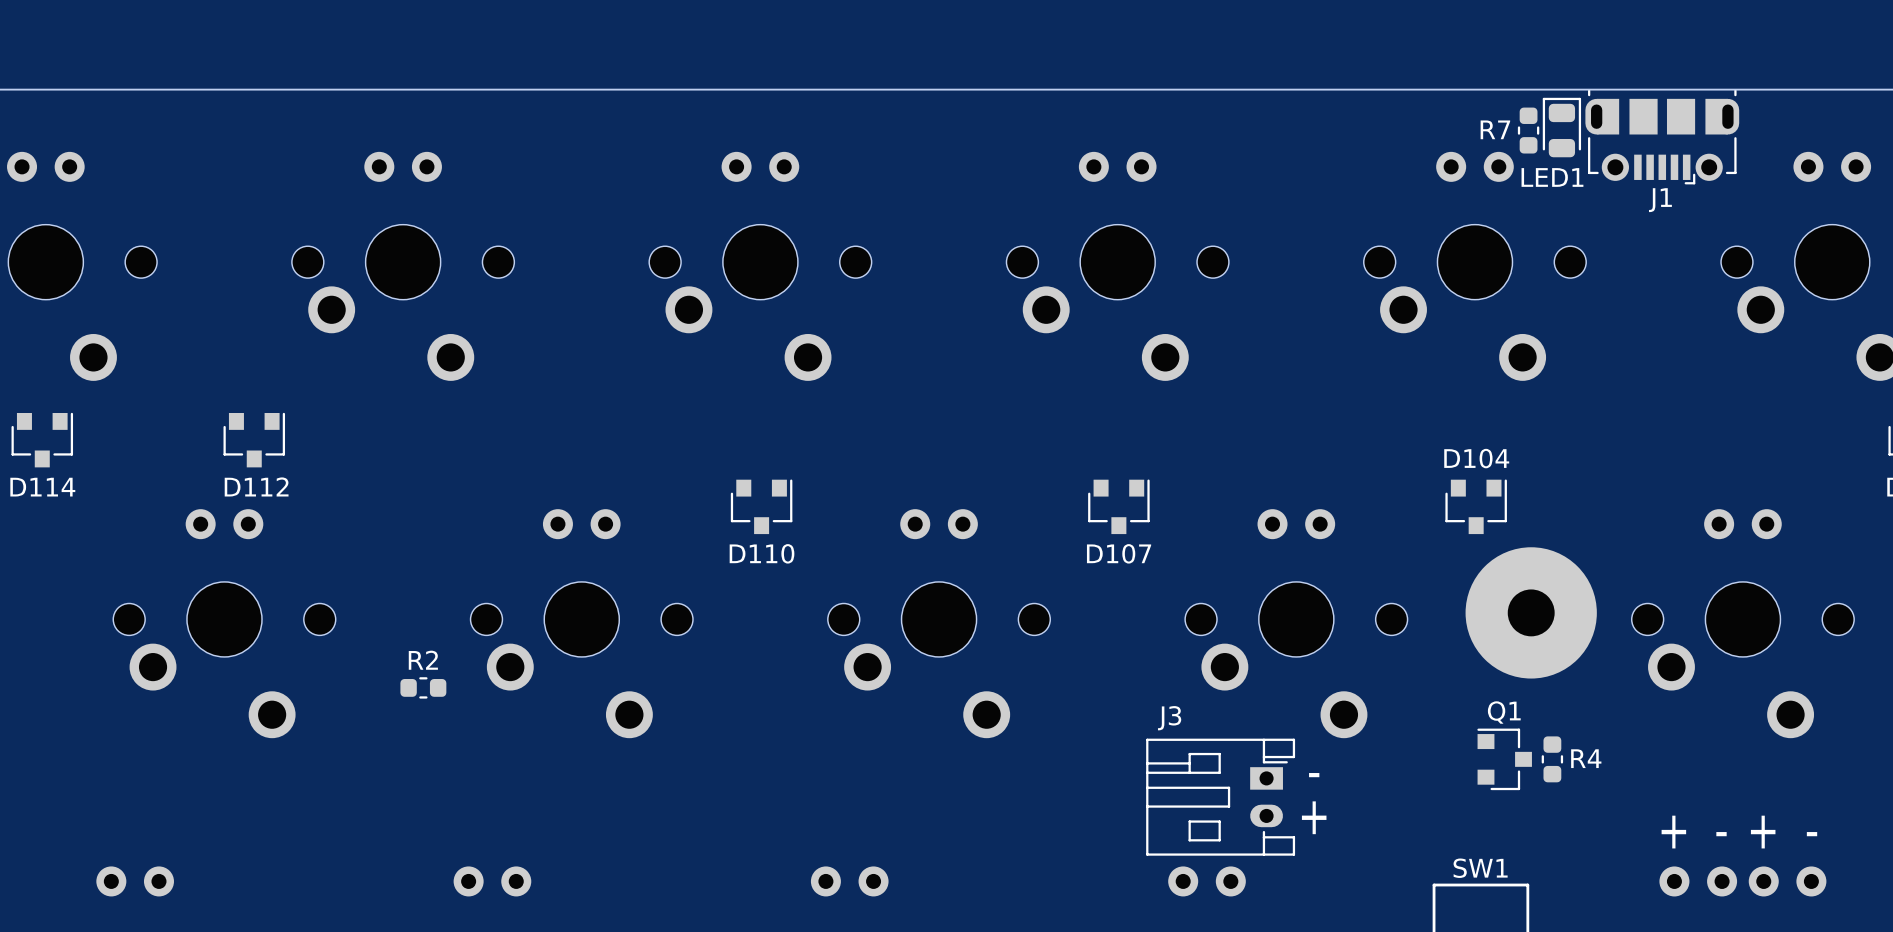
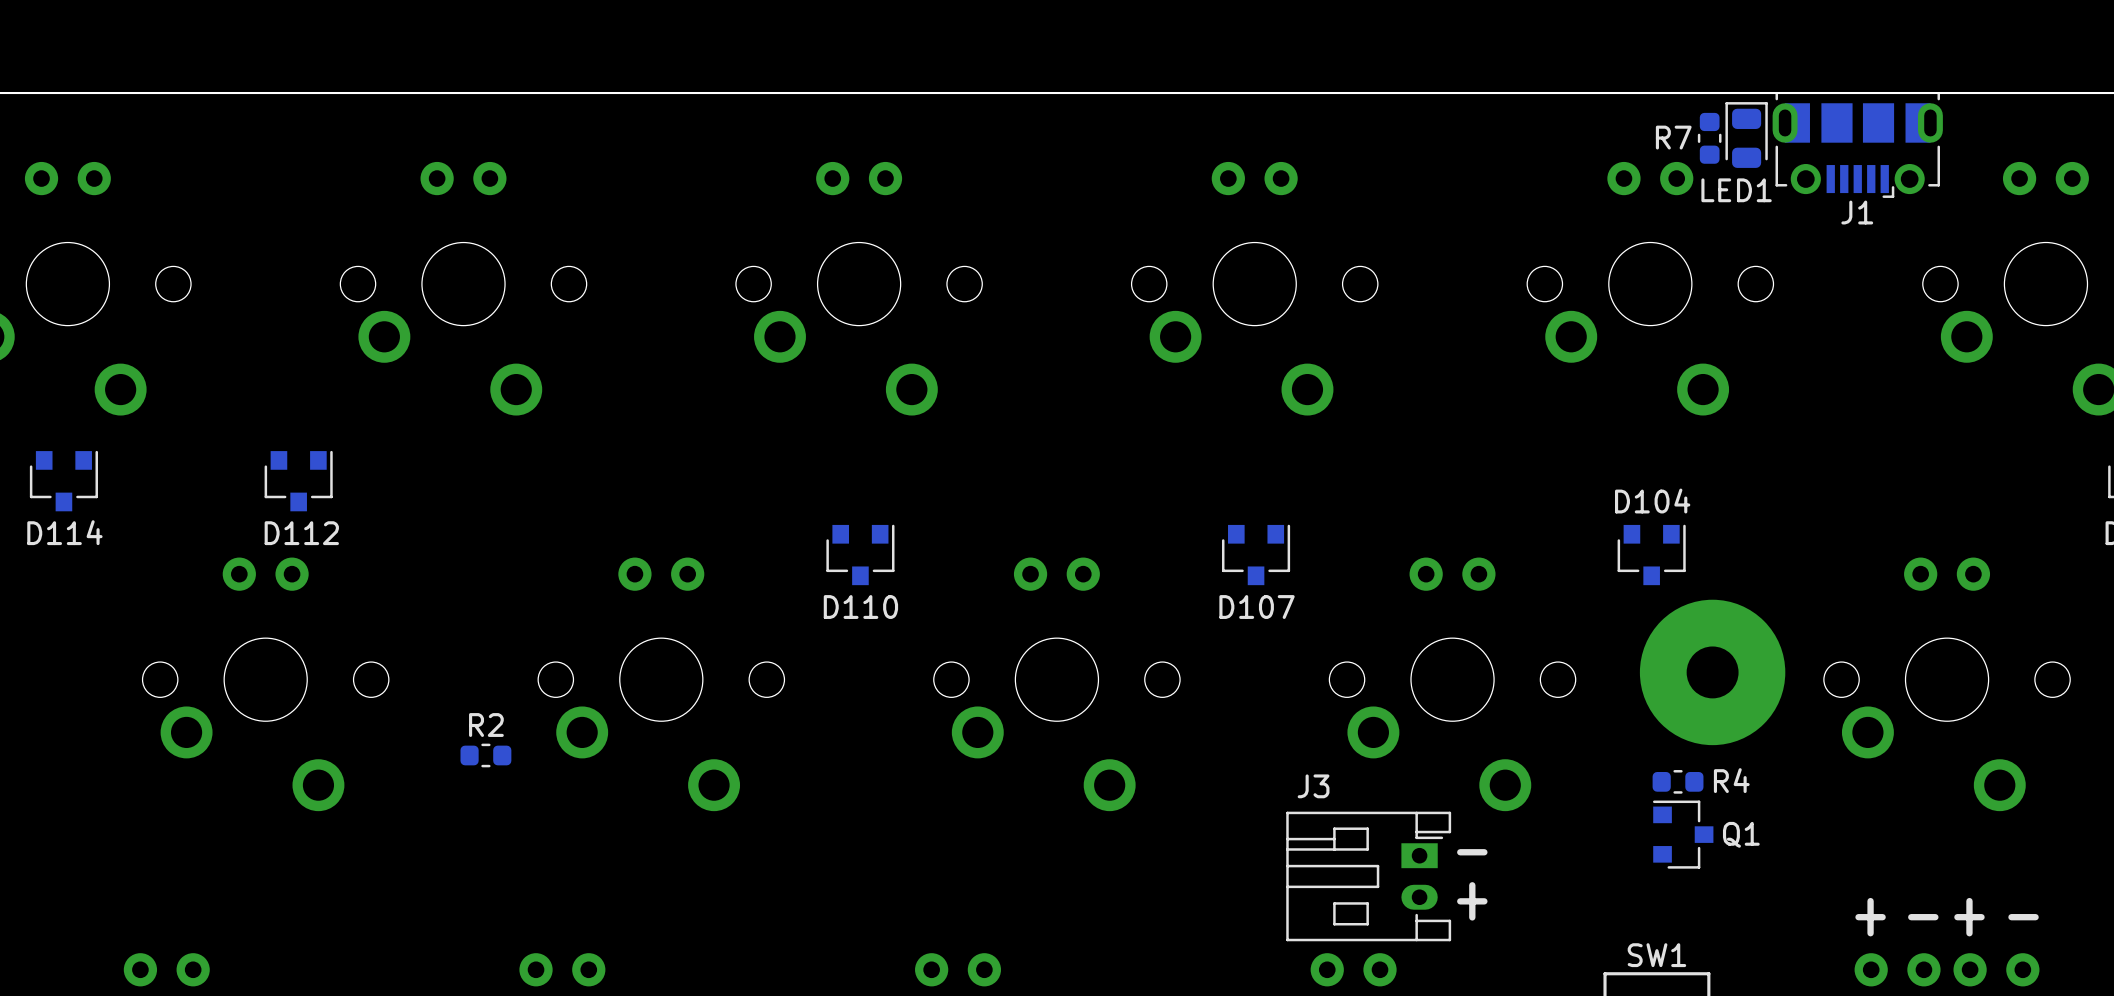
Q1 name position: Q1 (1504, 712) -> Q1 (1741, 834)
R4 rotation: 0° (1552, 759) -> 90° clockwise (1678, 781)
R4 position: (1552, 759) -> (1678, 781)

